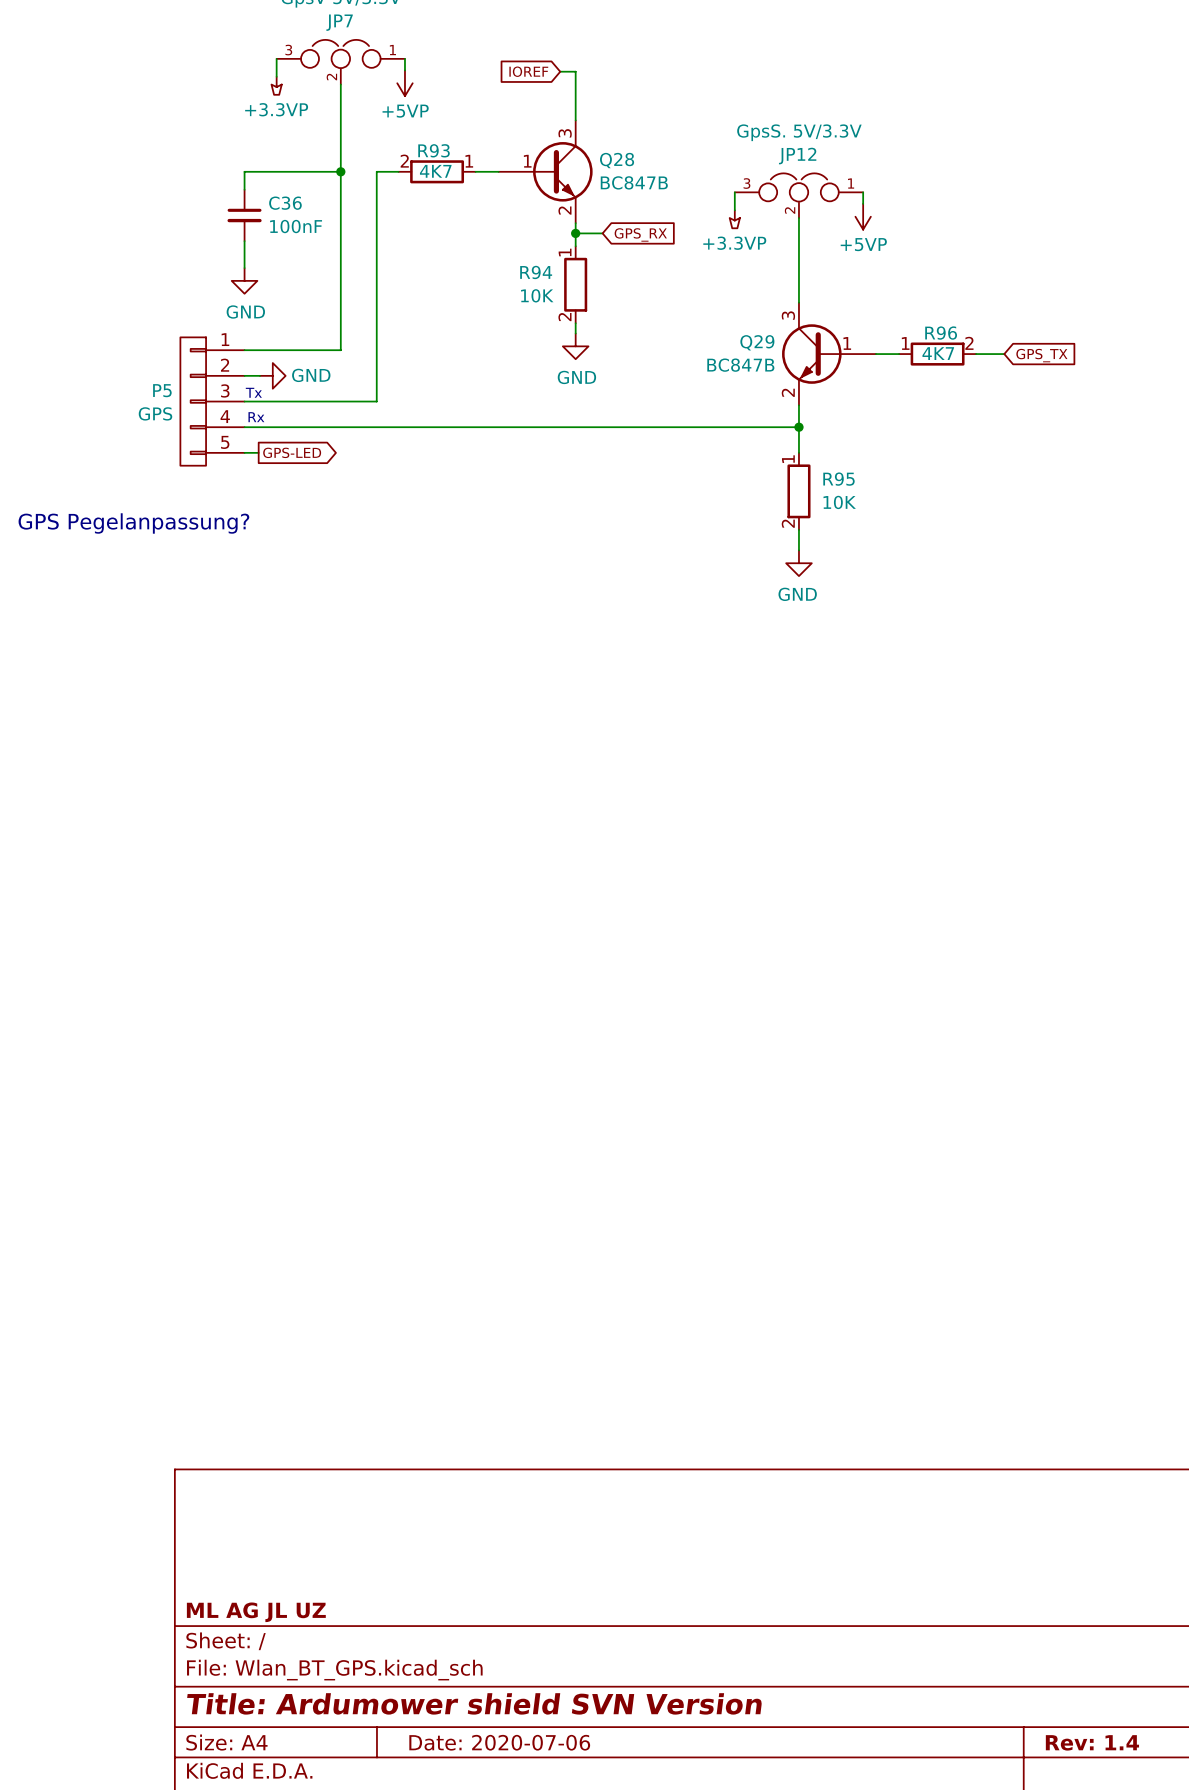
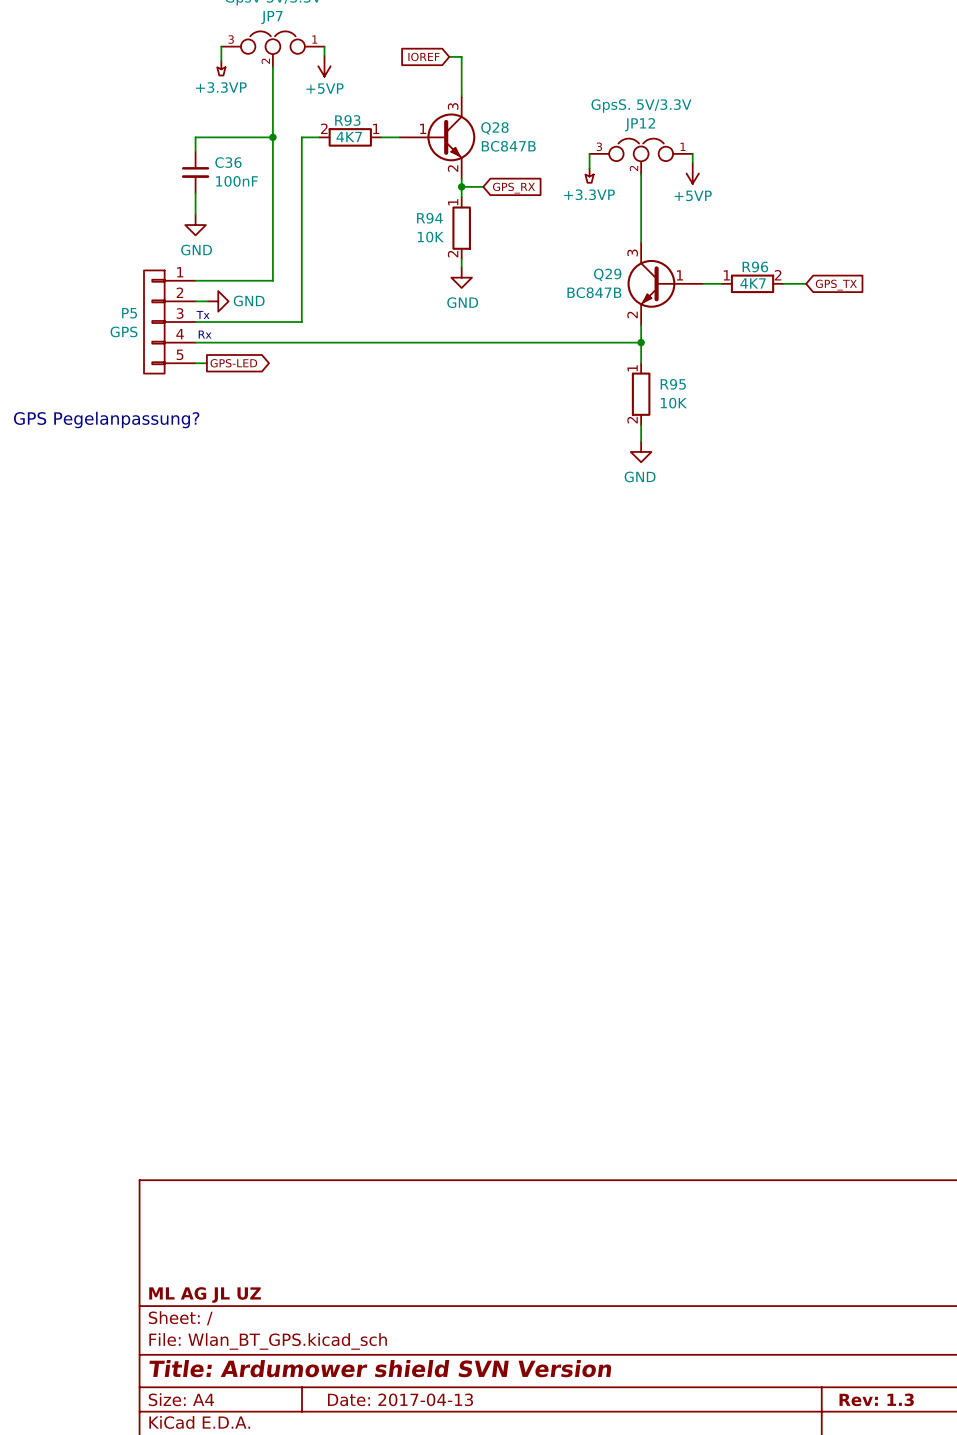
title block: Date: 2020-07-06 (499, 1742) -> Date: 2017-04-13 (400, 1399)
title block: Rev: 1.4 (1092, 1742) -> Rev: 1.3 (876, 1399)

